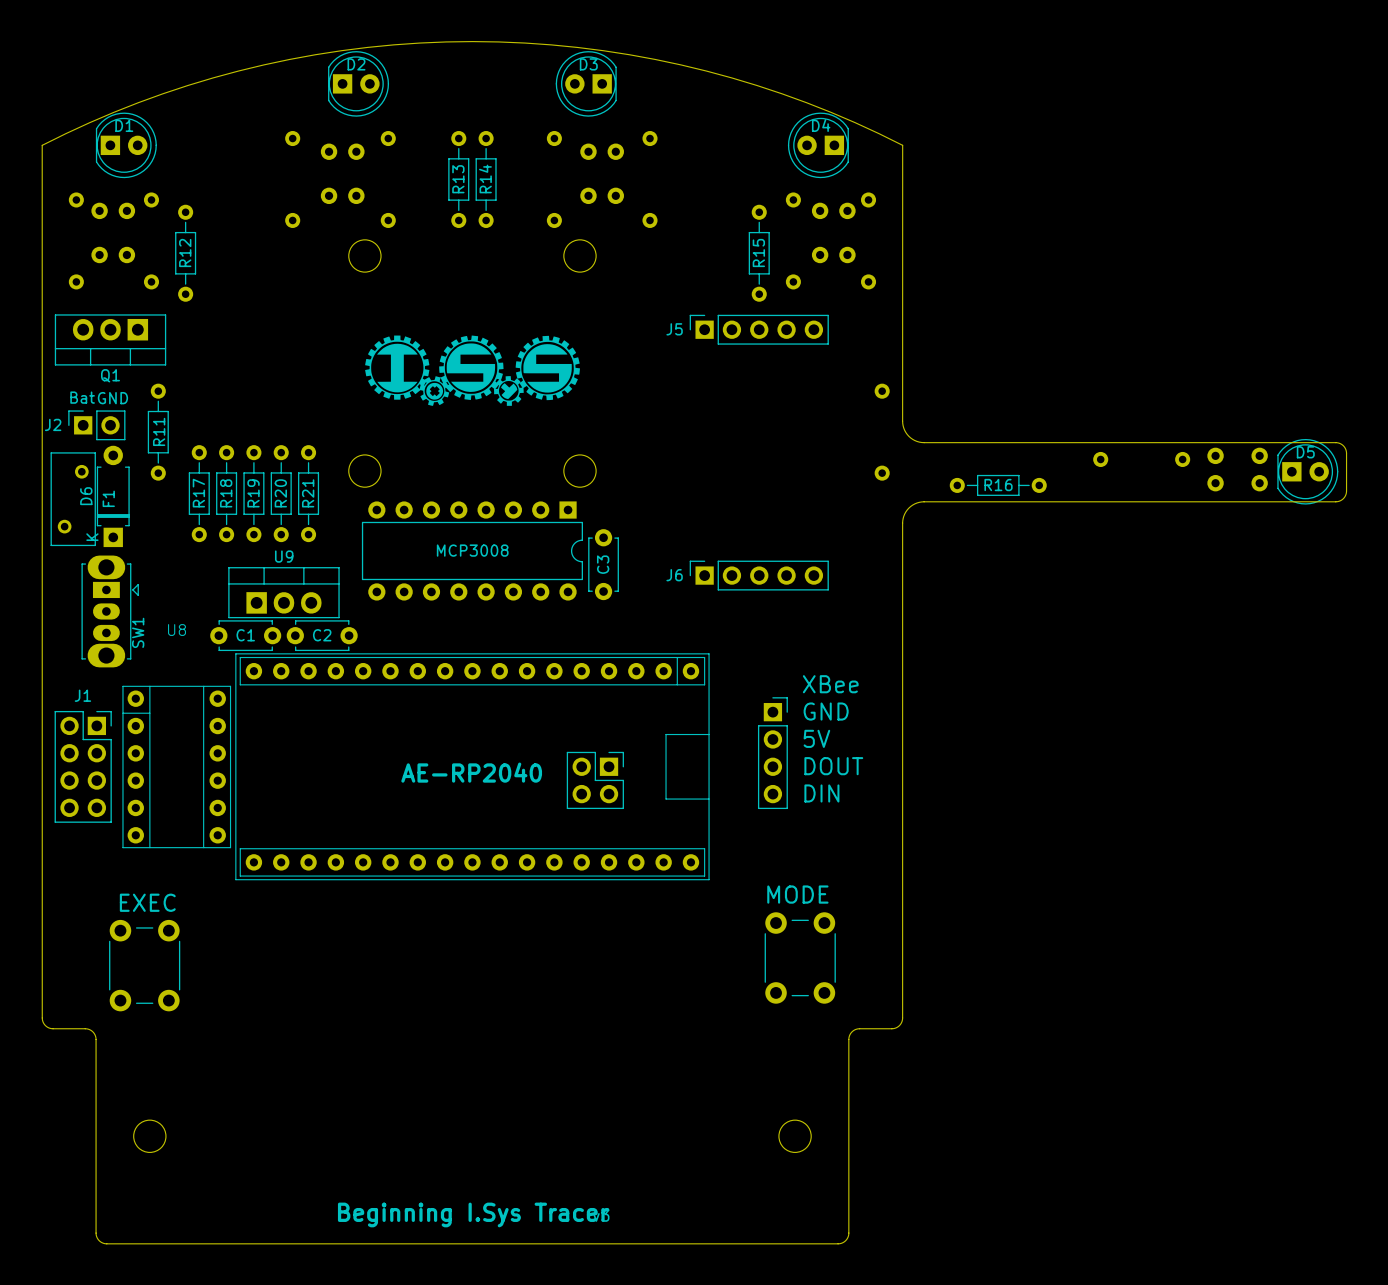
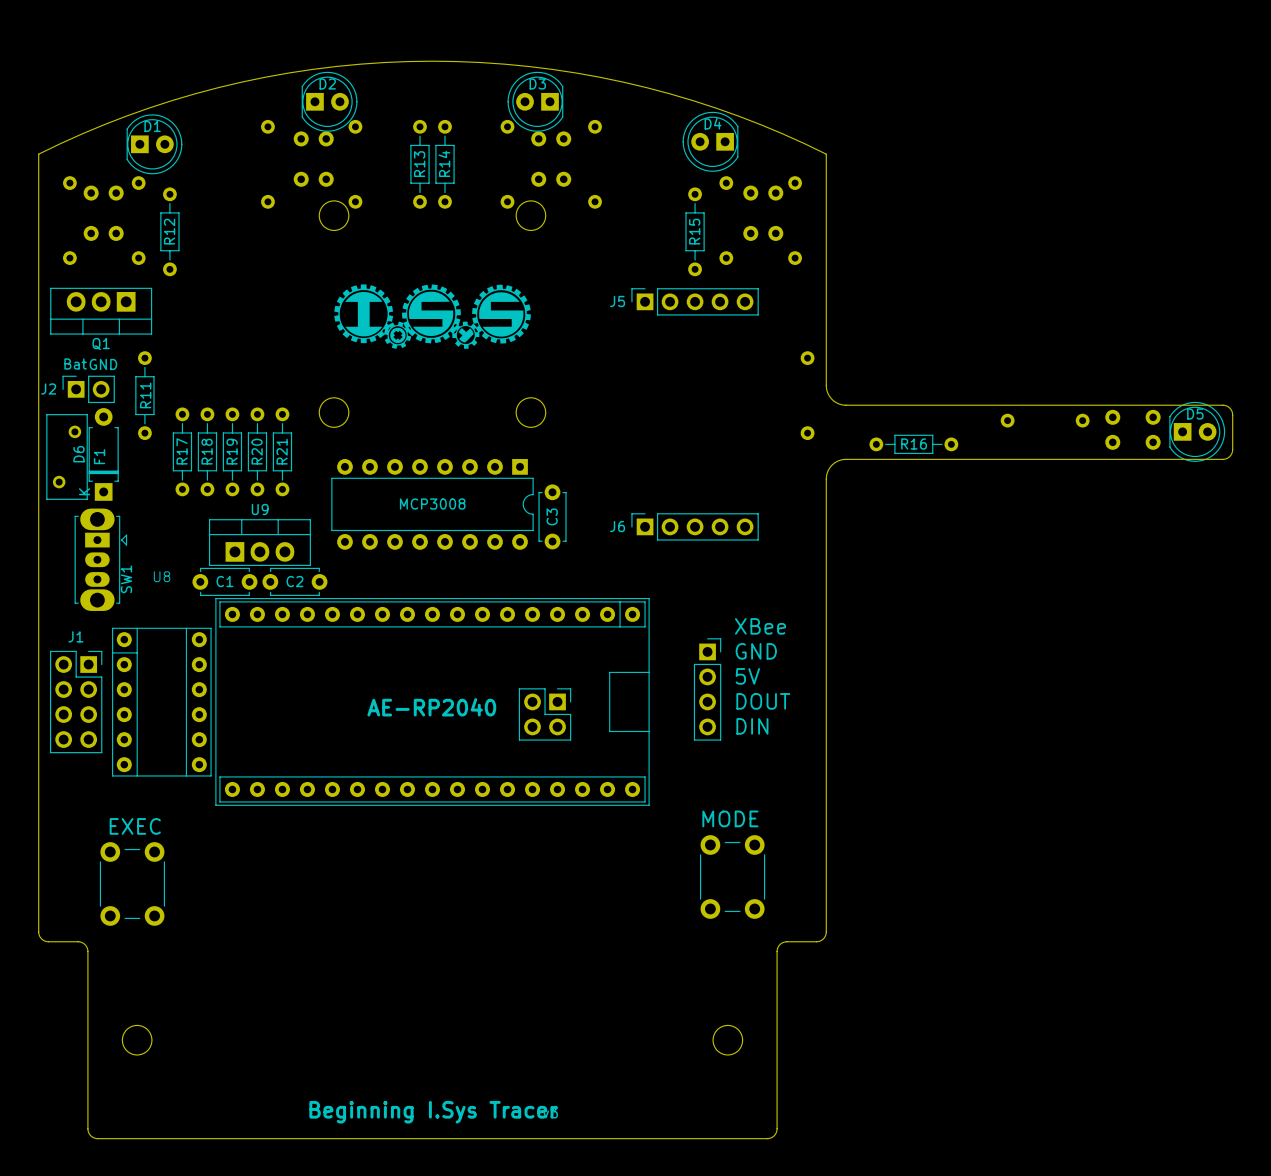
D2 position: (358, 83) -> (329, 101)
D3 position: (586, 83) -> (535, 101)
D1 footprint: [95, 112, 157, 179] -> [126, 114, 183, 175]
D4 footprint: [787, 112, 849, 179] -> [682, 111, 739, 172]
board edge: (42, 145) (113, 112) (213, 77) (289, 59) (393, 44) (498, 41) (577, 47) (680, 64) (757, 85) (831, 112) (902, 145) (902, 421) -> (38, 931) (38, 154) (104, 124) (172, 100) (241, 82) (336, 66) (408, 61) (504, 64) (599, 77) (669, 93) (760, 124) (826, 154) (826, 385)
board edge: (42, 145) (42, 1017) -> none
round board edge position: (364, 255) -> (334, 215)
round board edge position: (579, 255) -> (530, 215)
drawing position: (472, 370) -> (432, 316)
round board edge position: (364, 471) -> (334, 412)
round board edge position: (579, 471) -> (530, 412)

